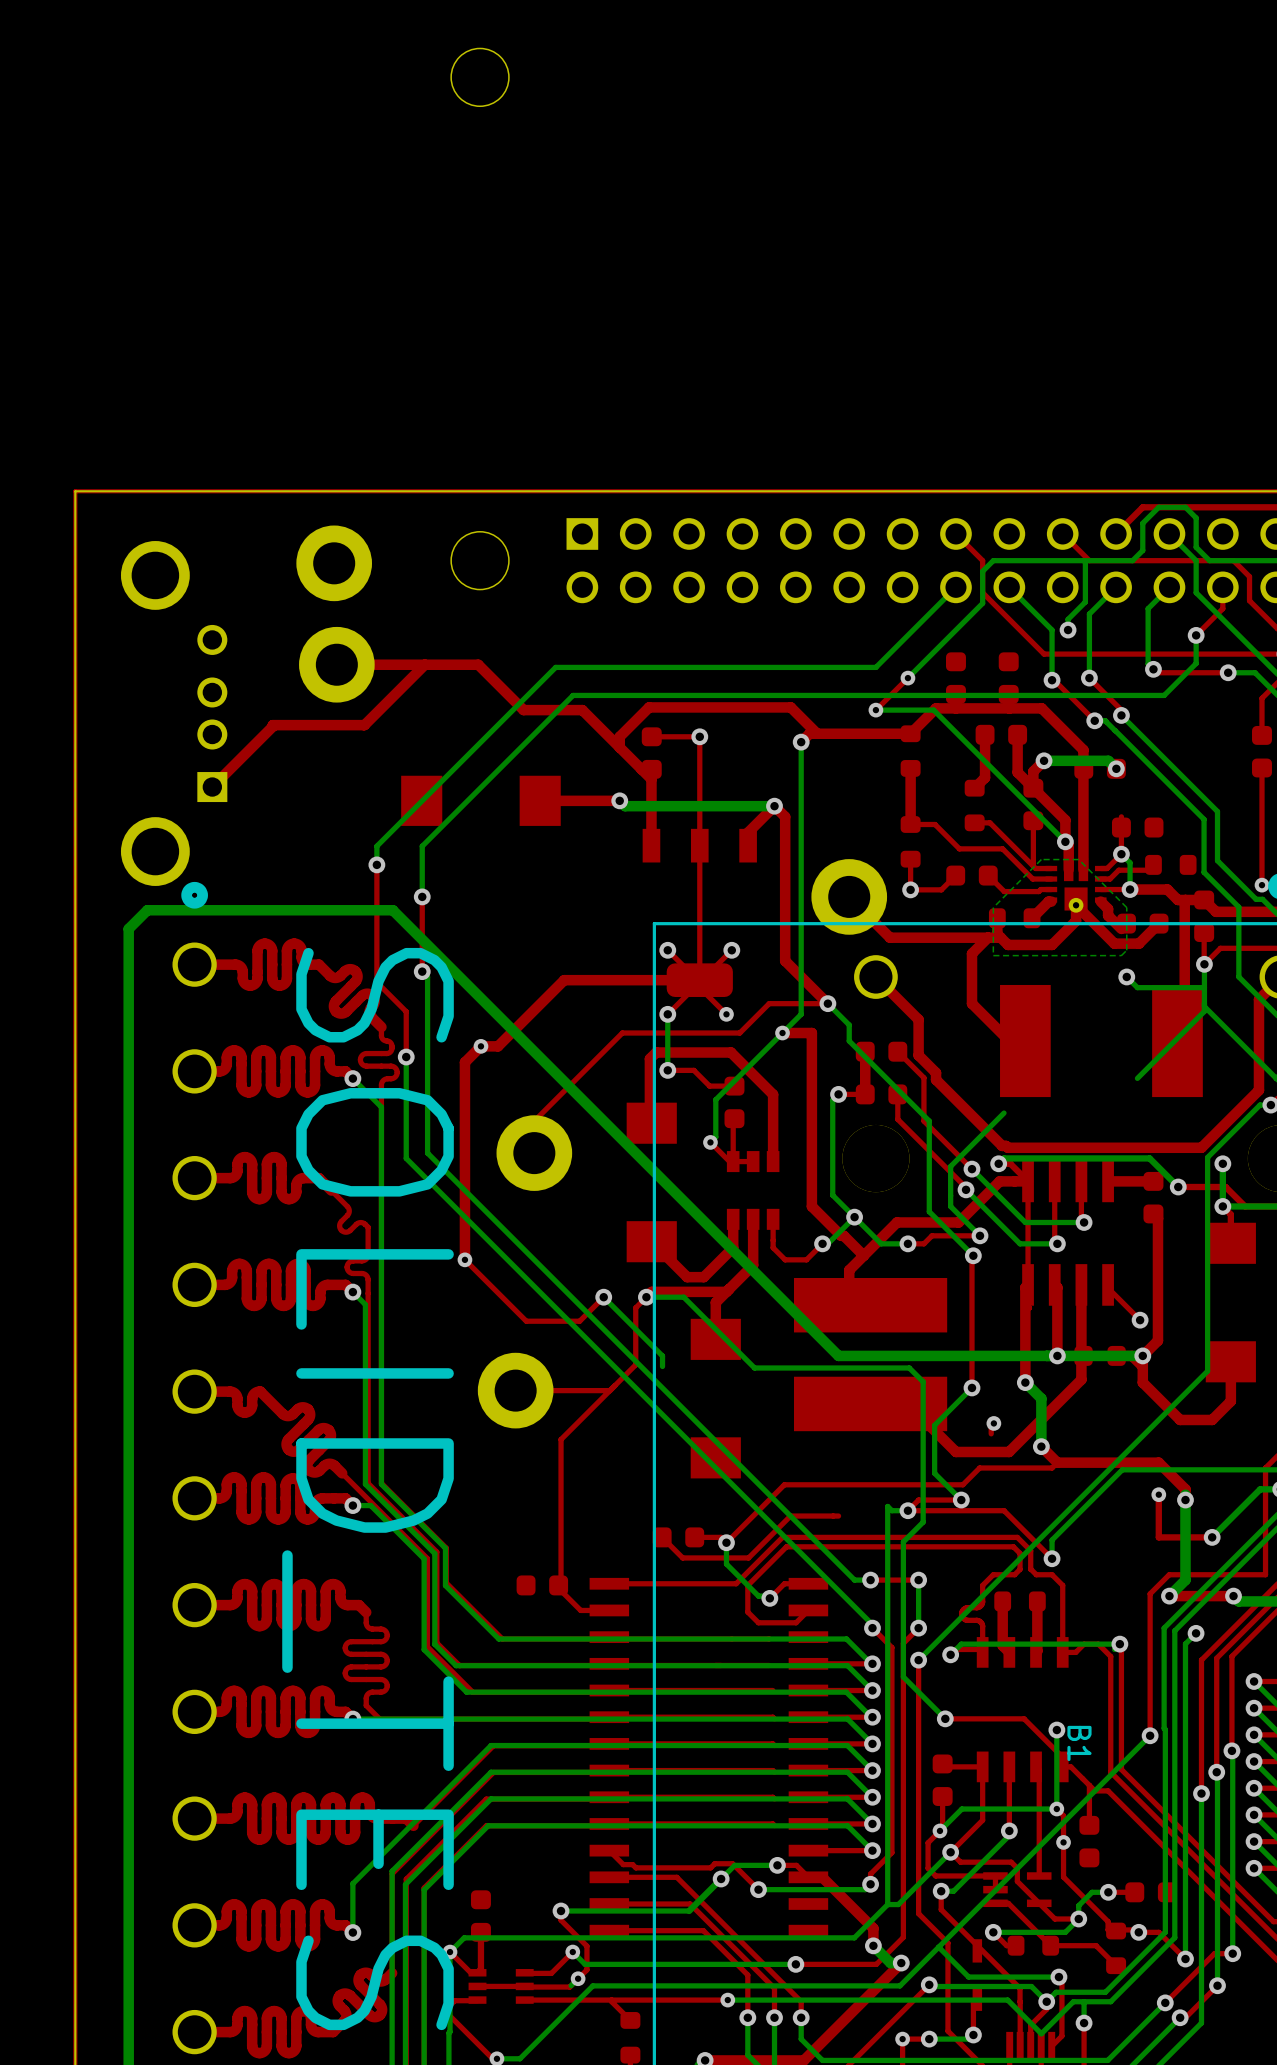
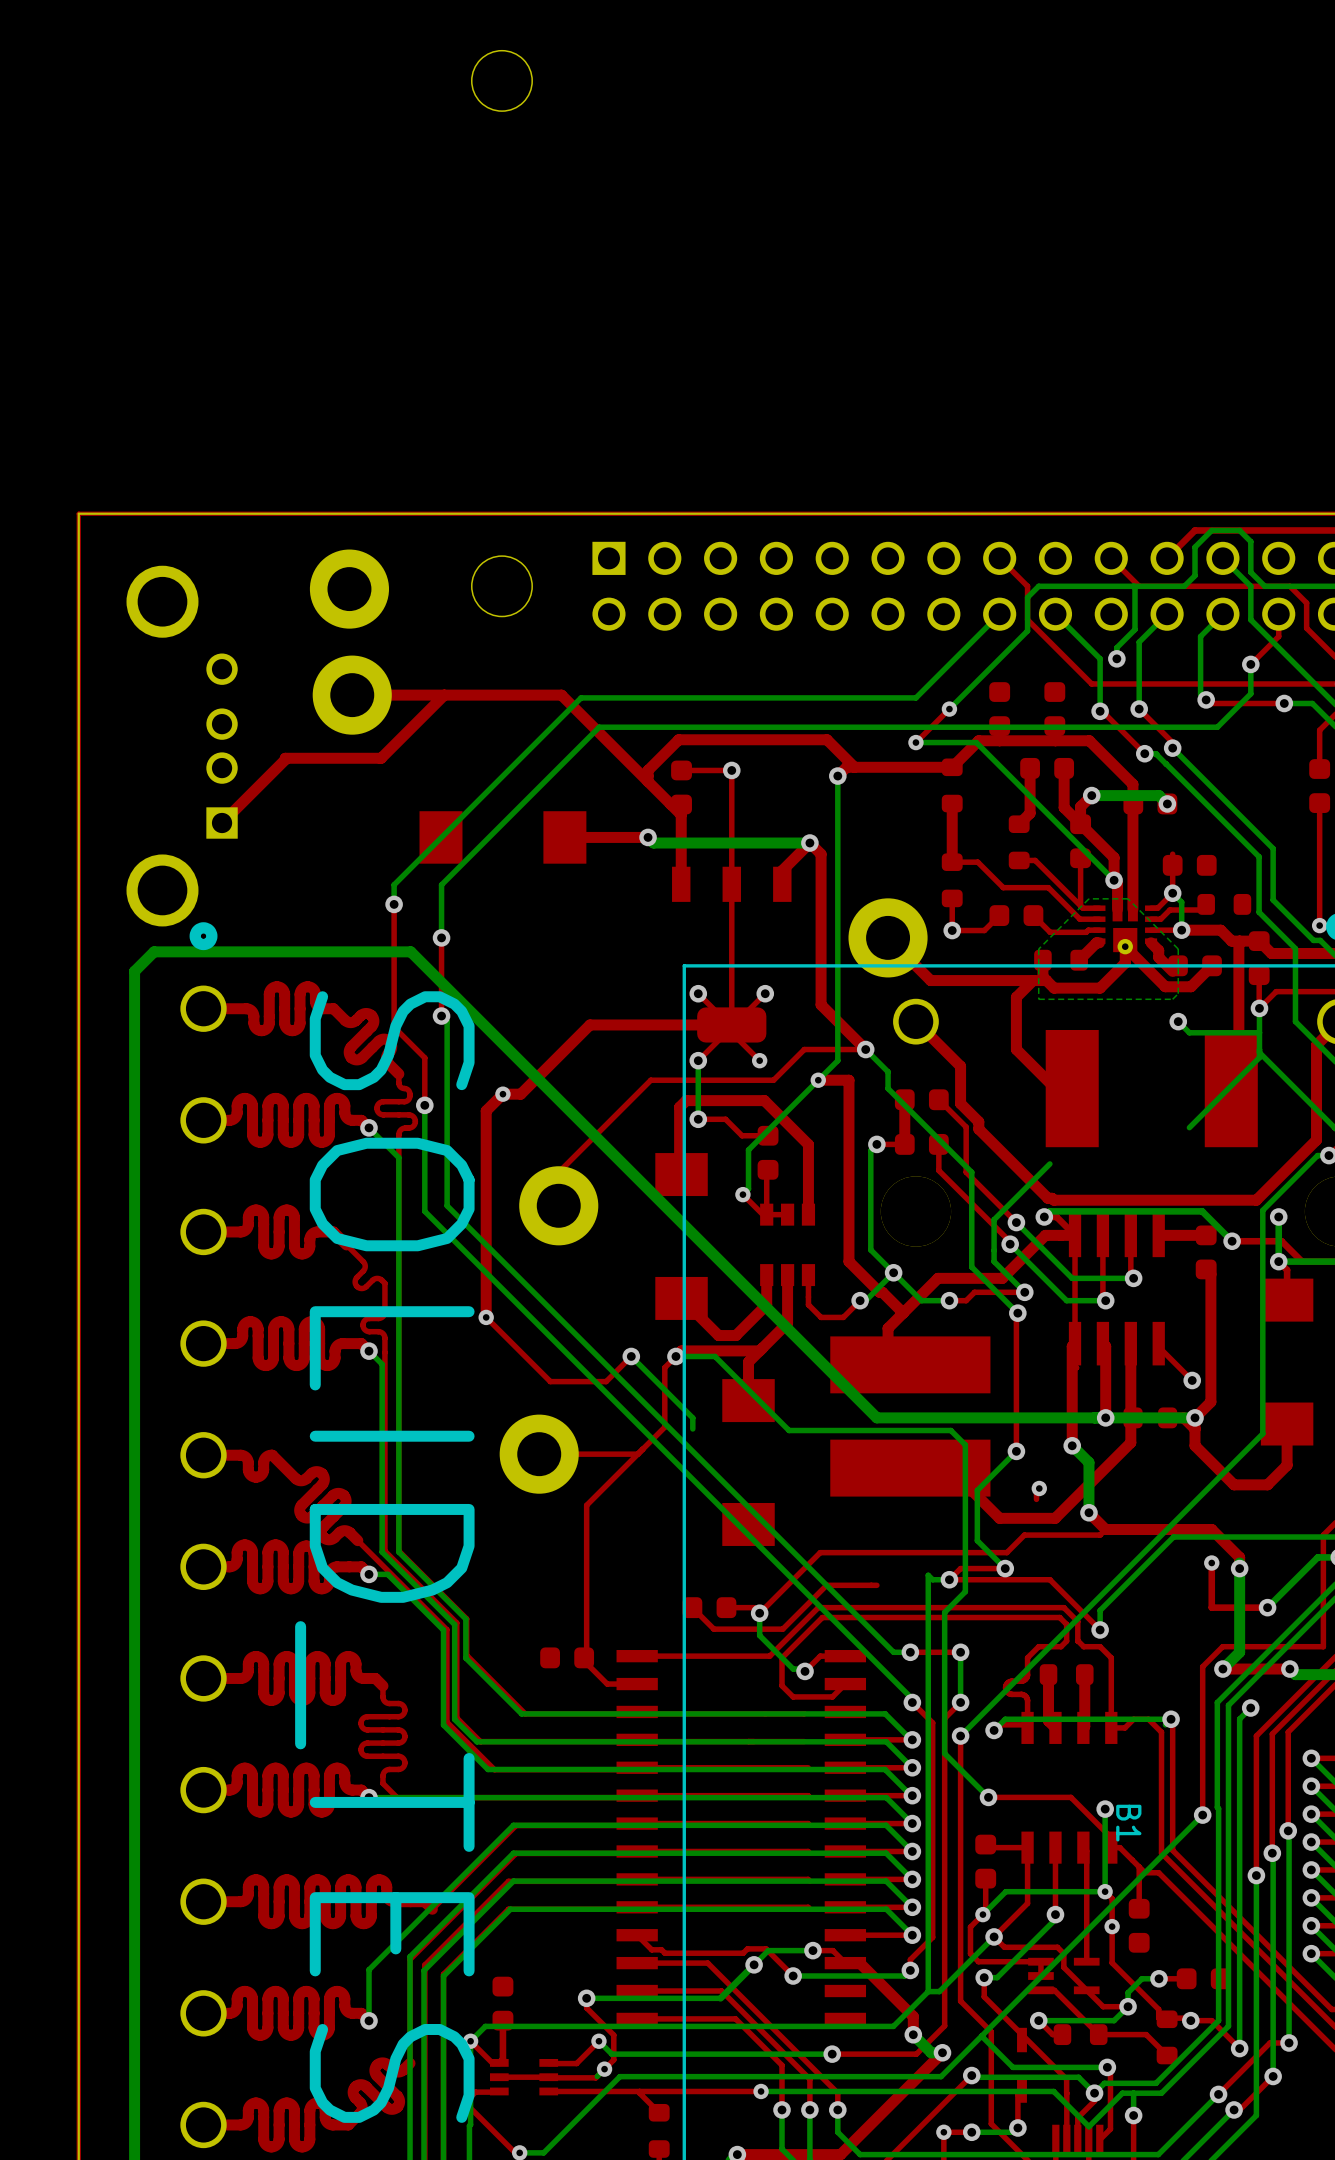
top track: (478, 664) (523, 710) (582, 710) -> (500, 695) (561, 695) (608, 742)

